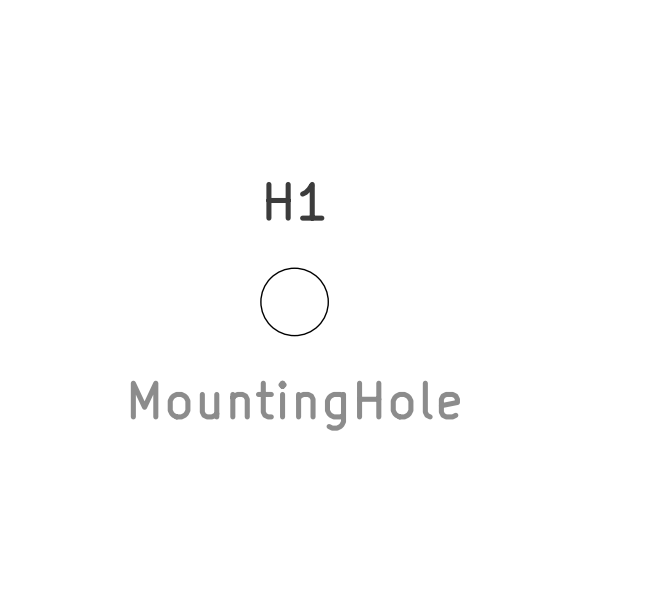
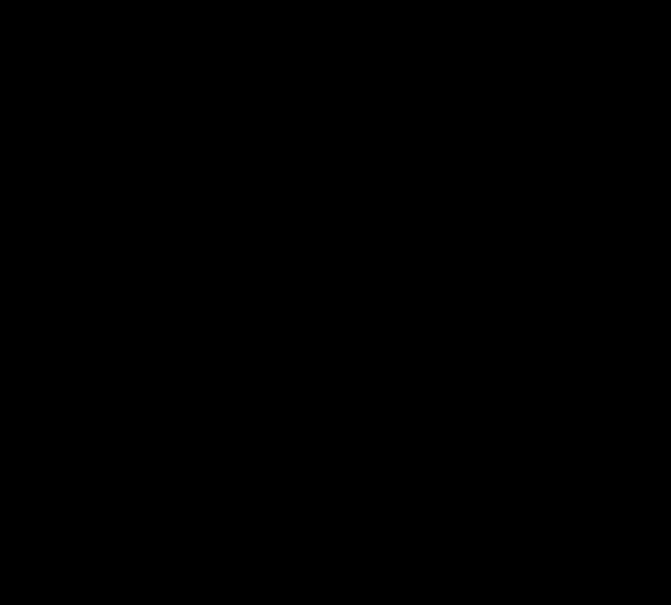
H1: MountingHole (294, 301) -> none

